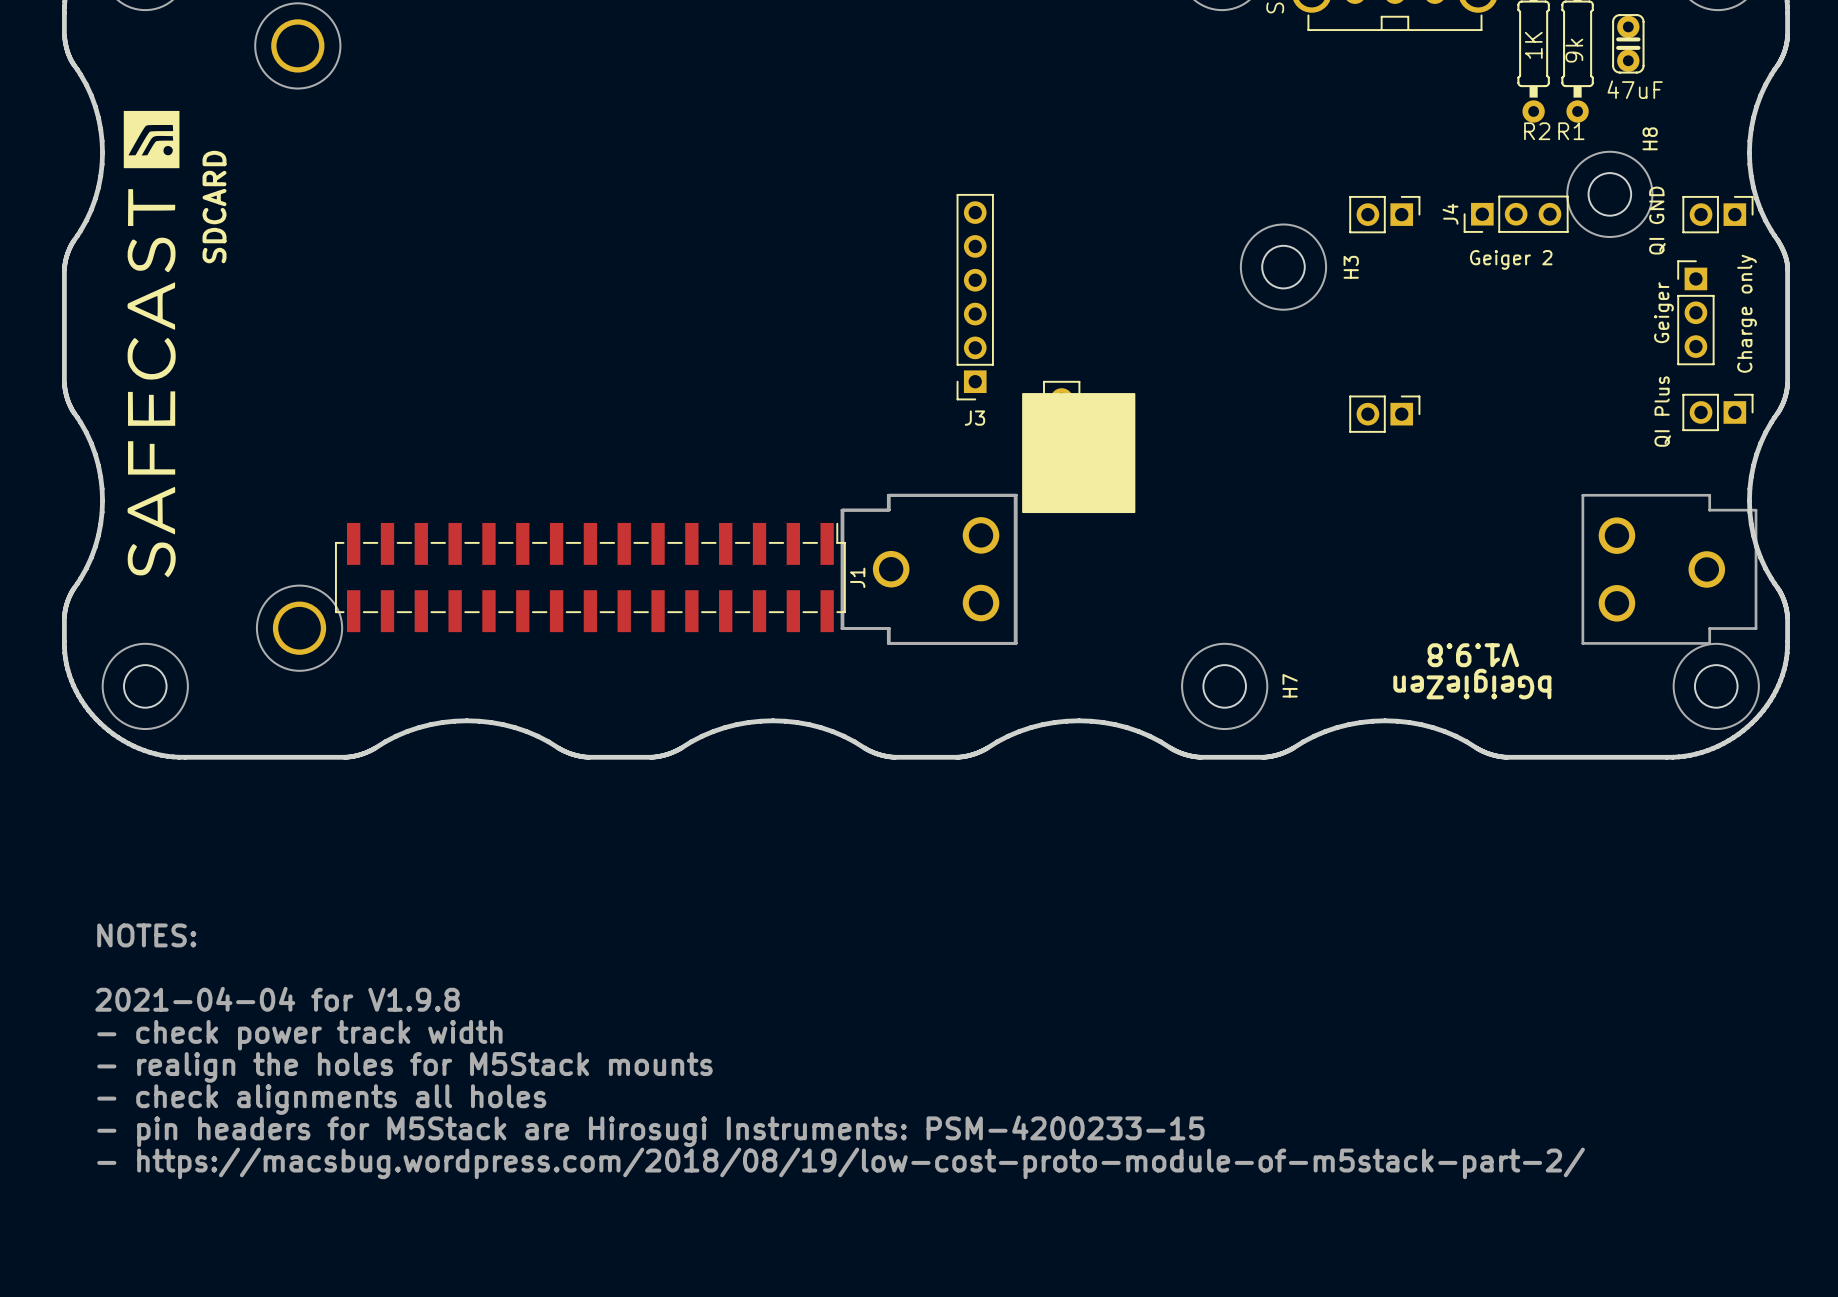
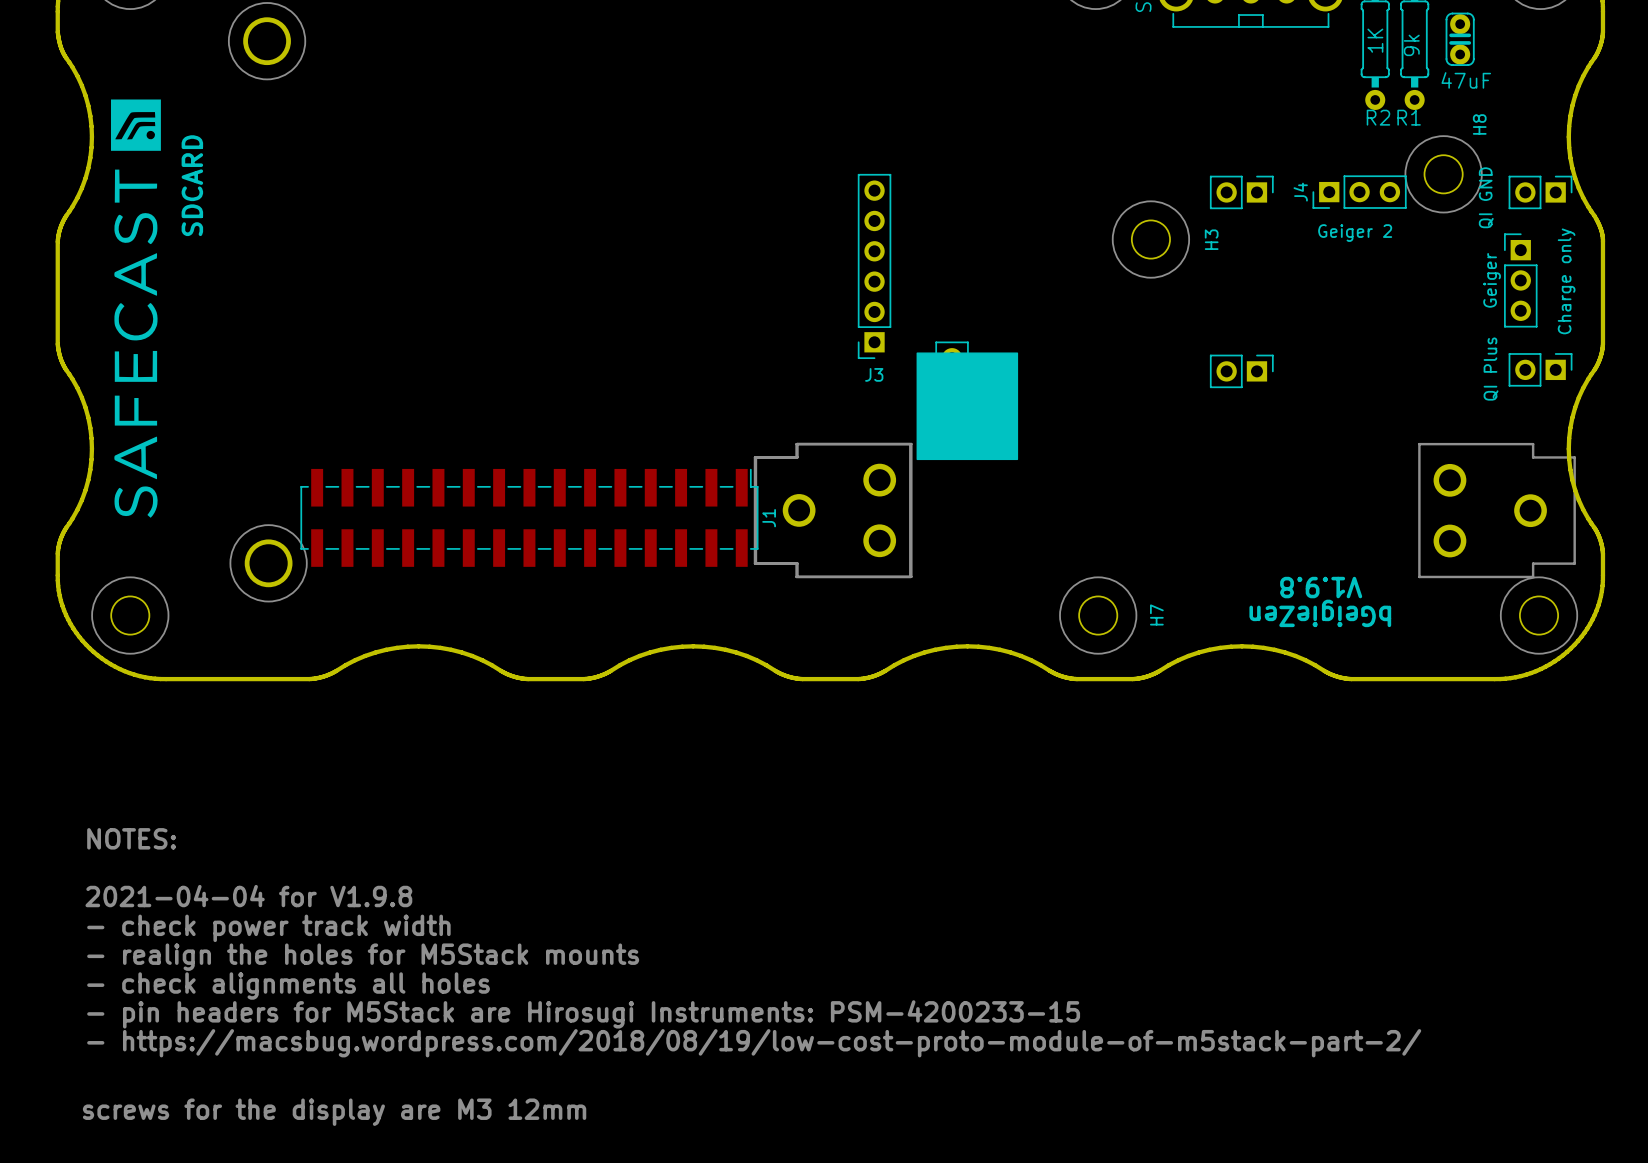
text: none -> screws for the display are M3 12mm (334, 1112)

